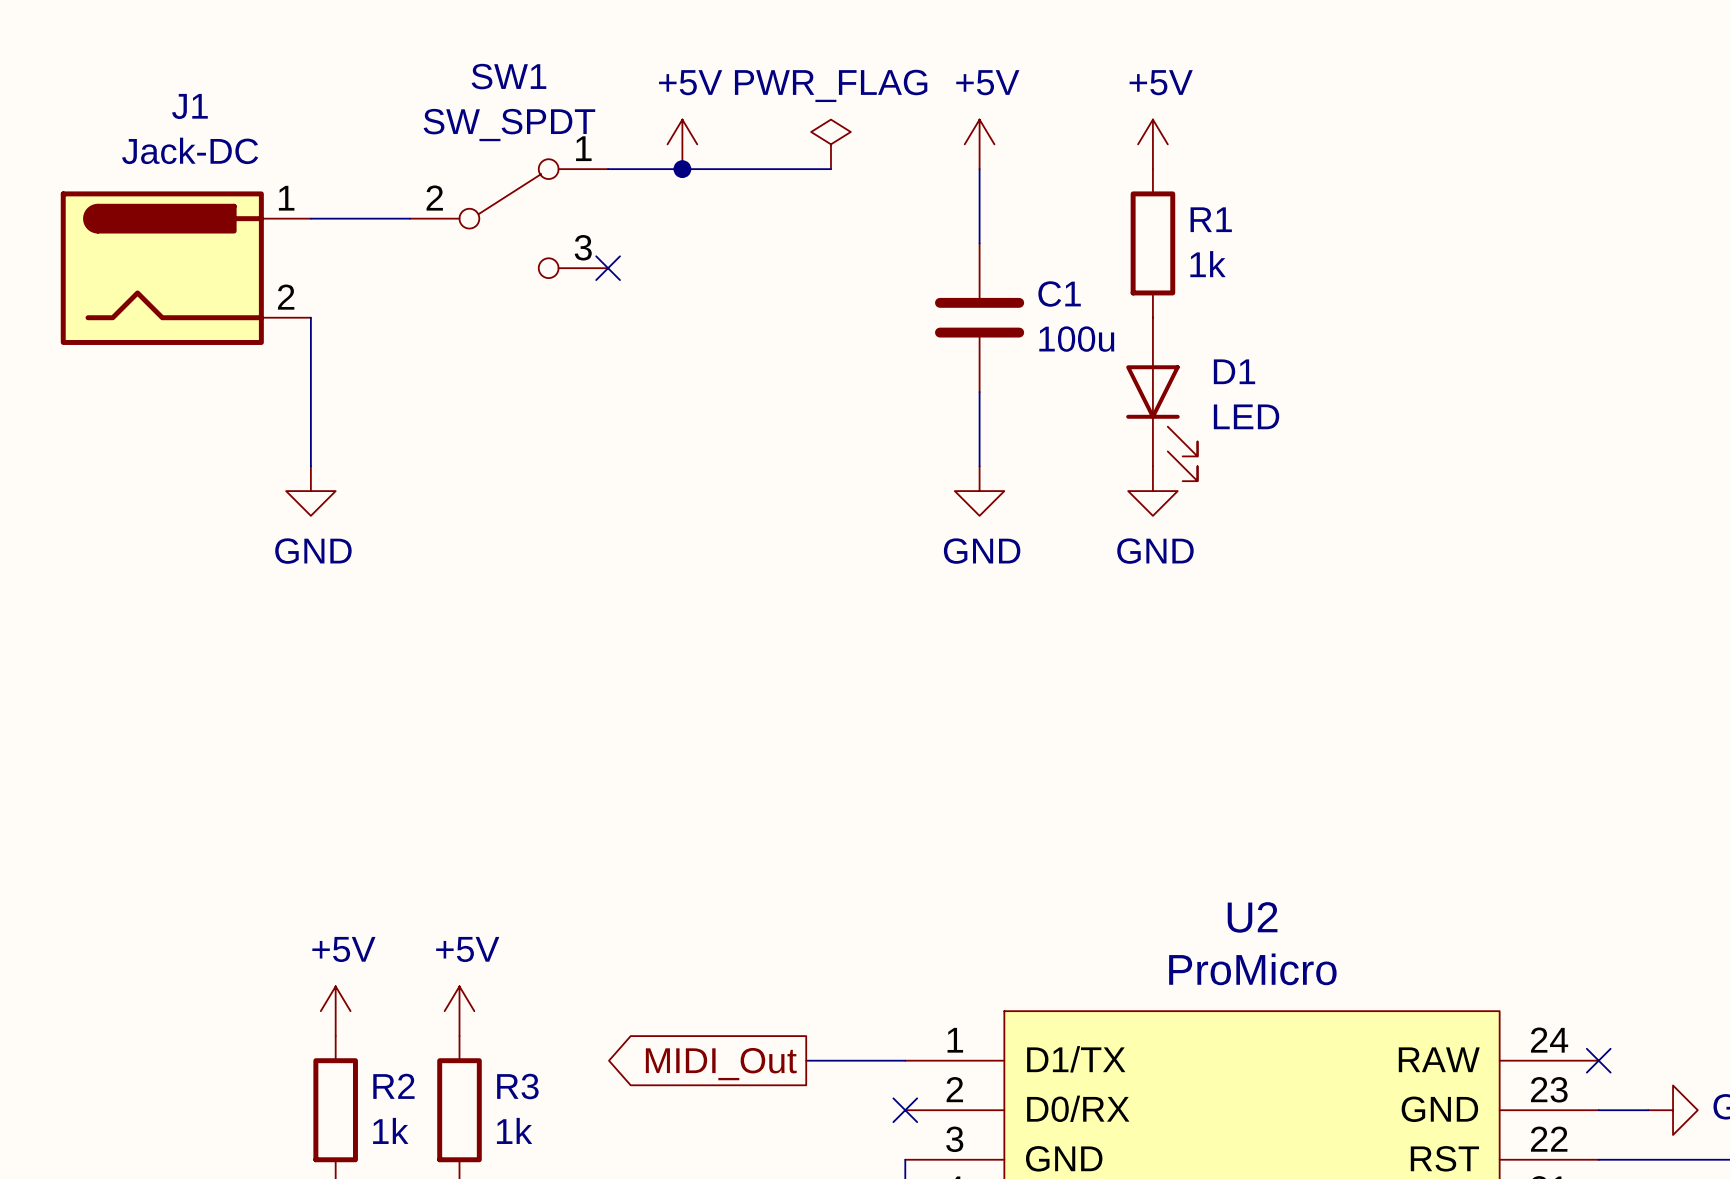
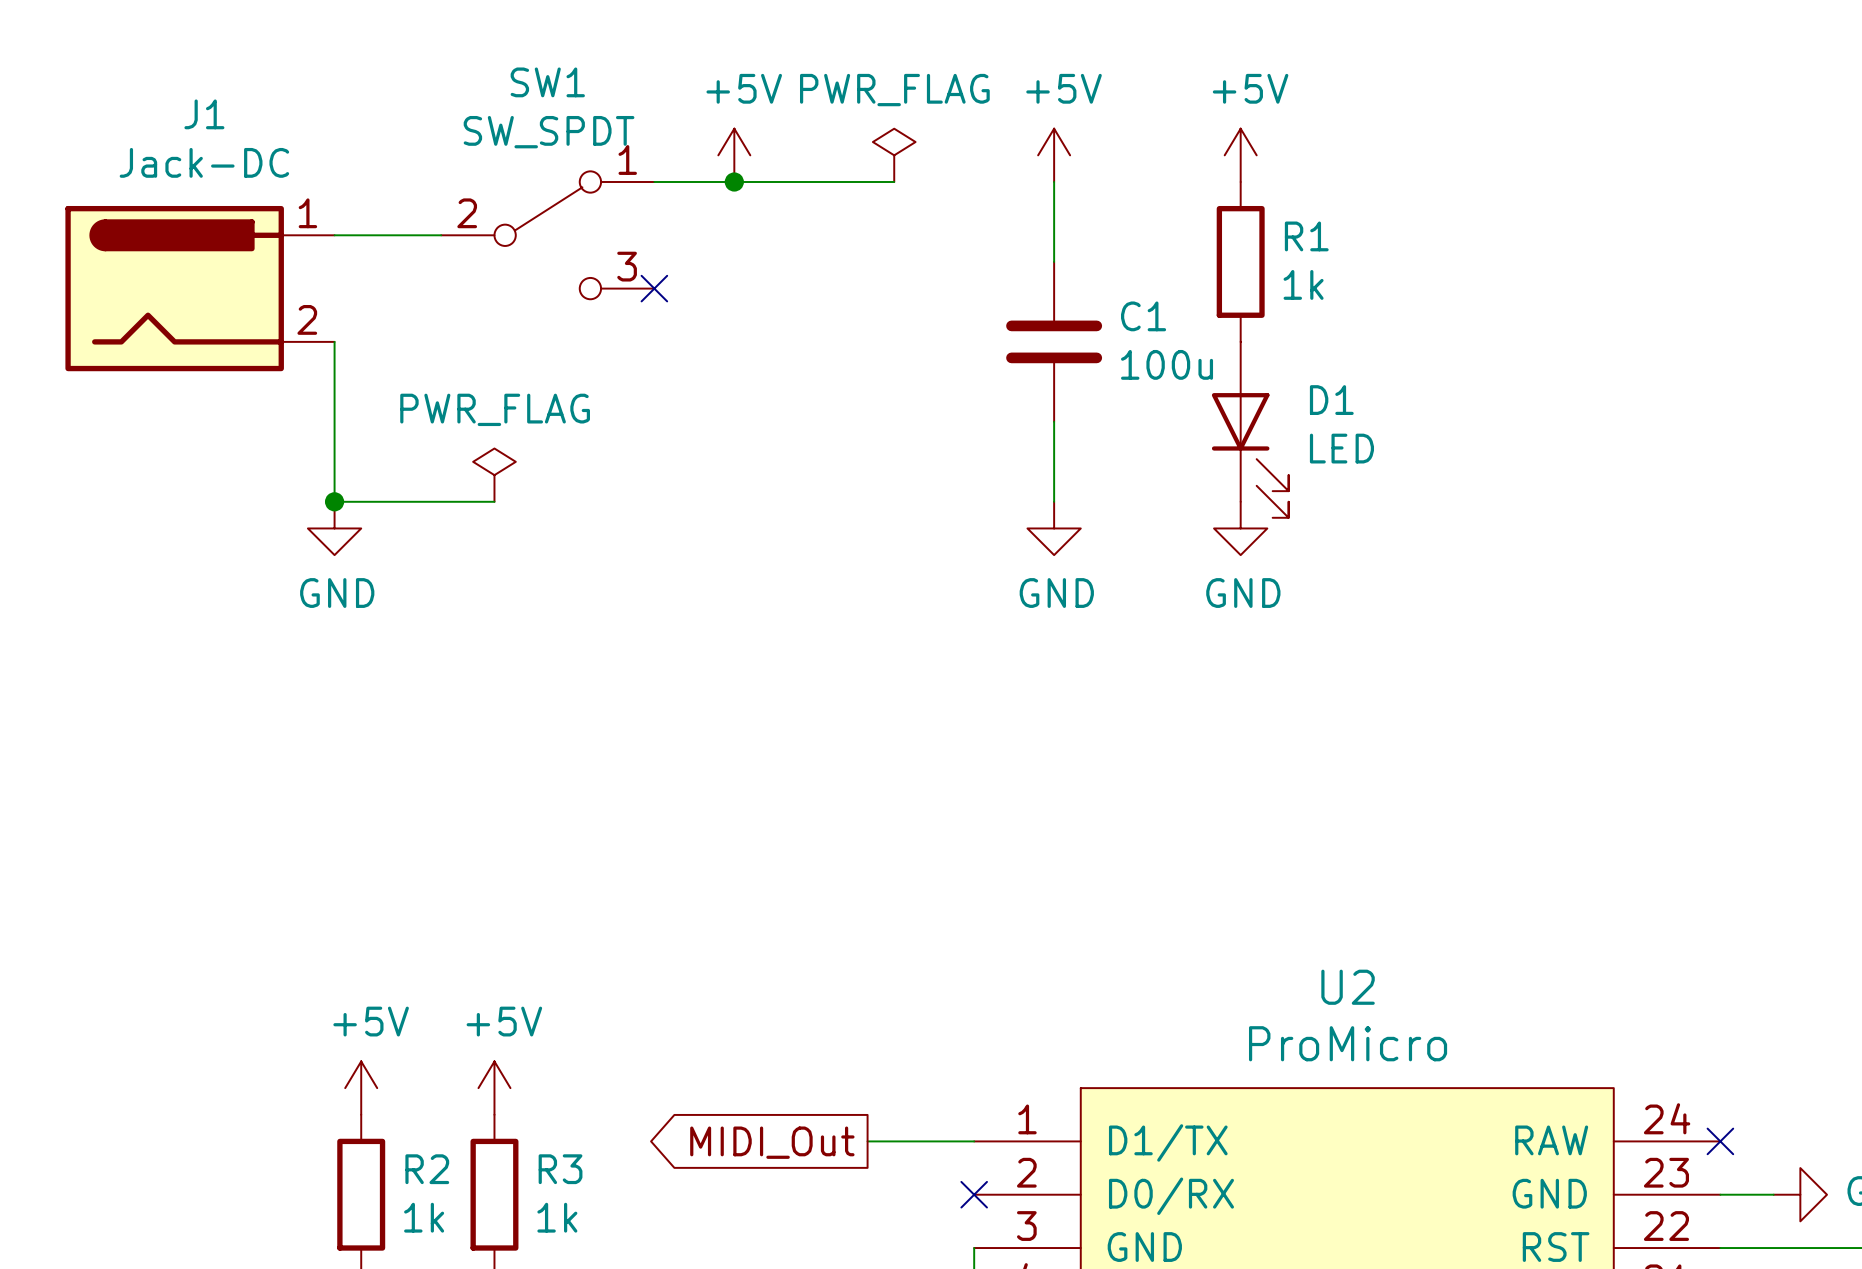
power symbol: none -> PWR_FLAG (494, 475)
wire: none -> (334, 501) (494, 501)
junction: none -> (334, 501)

